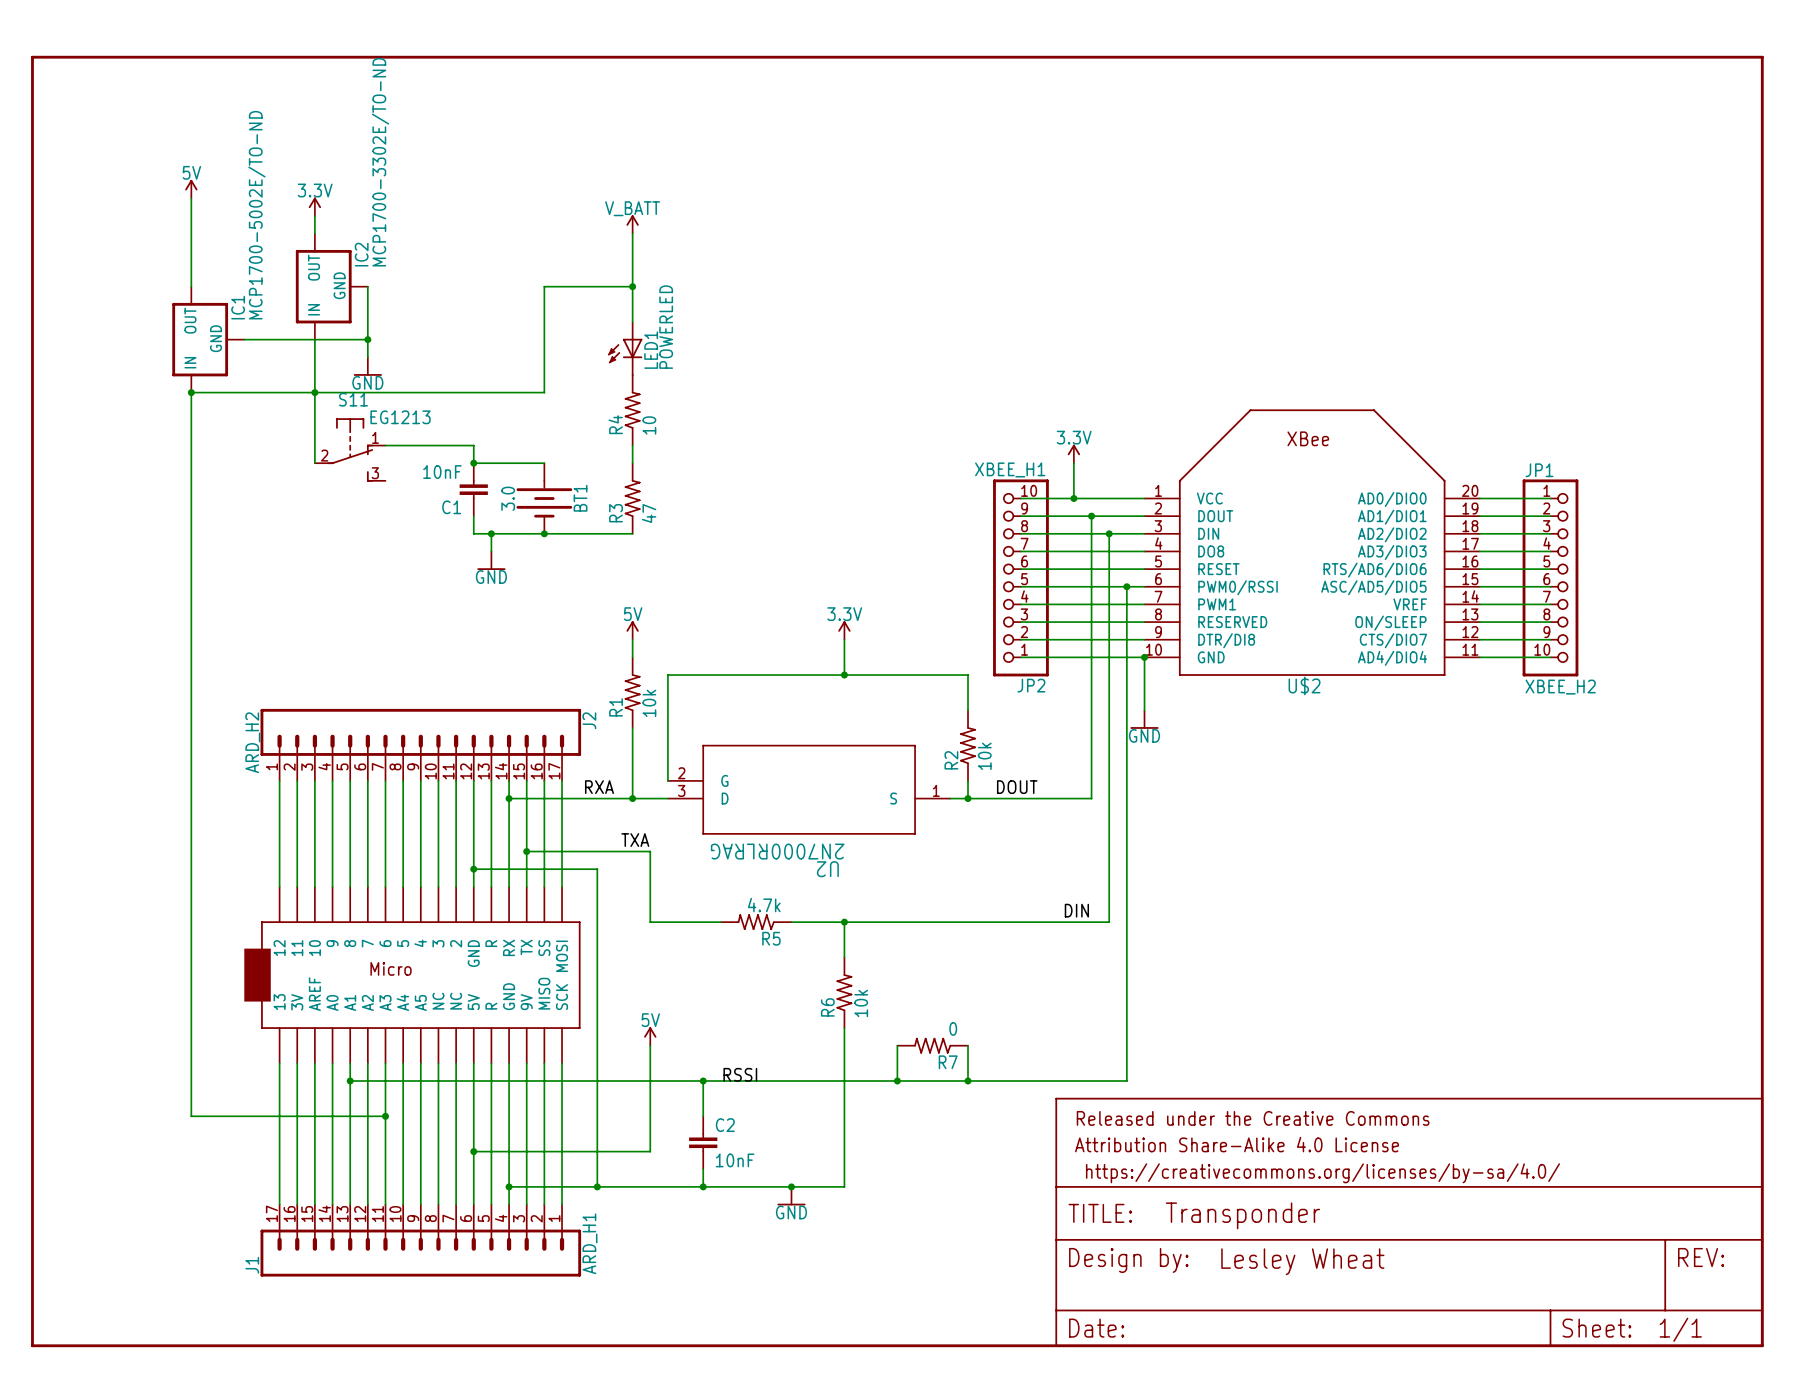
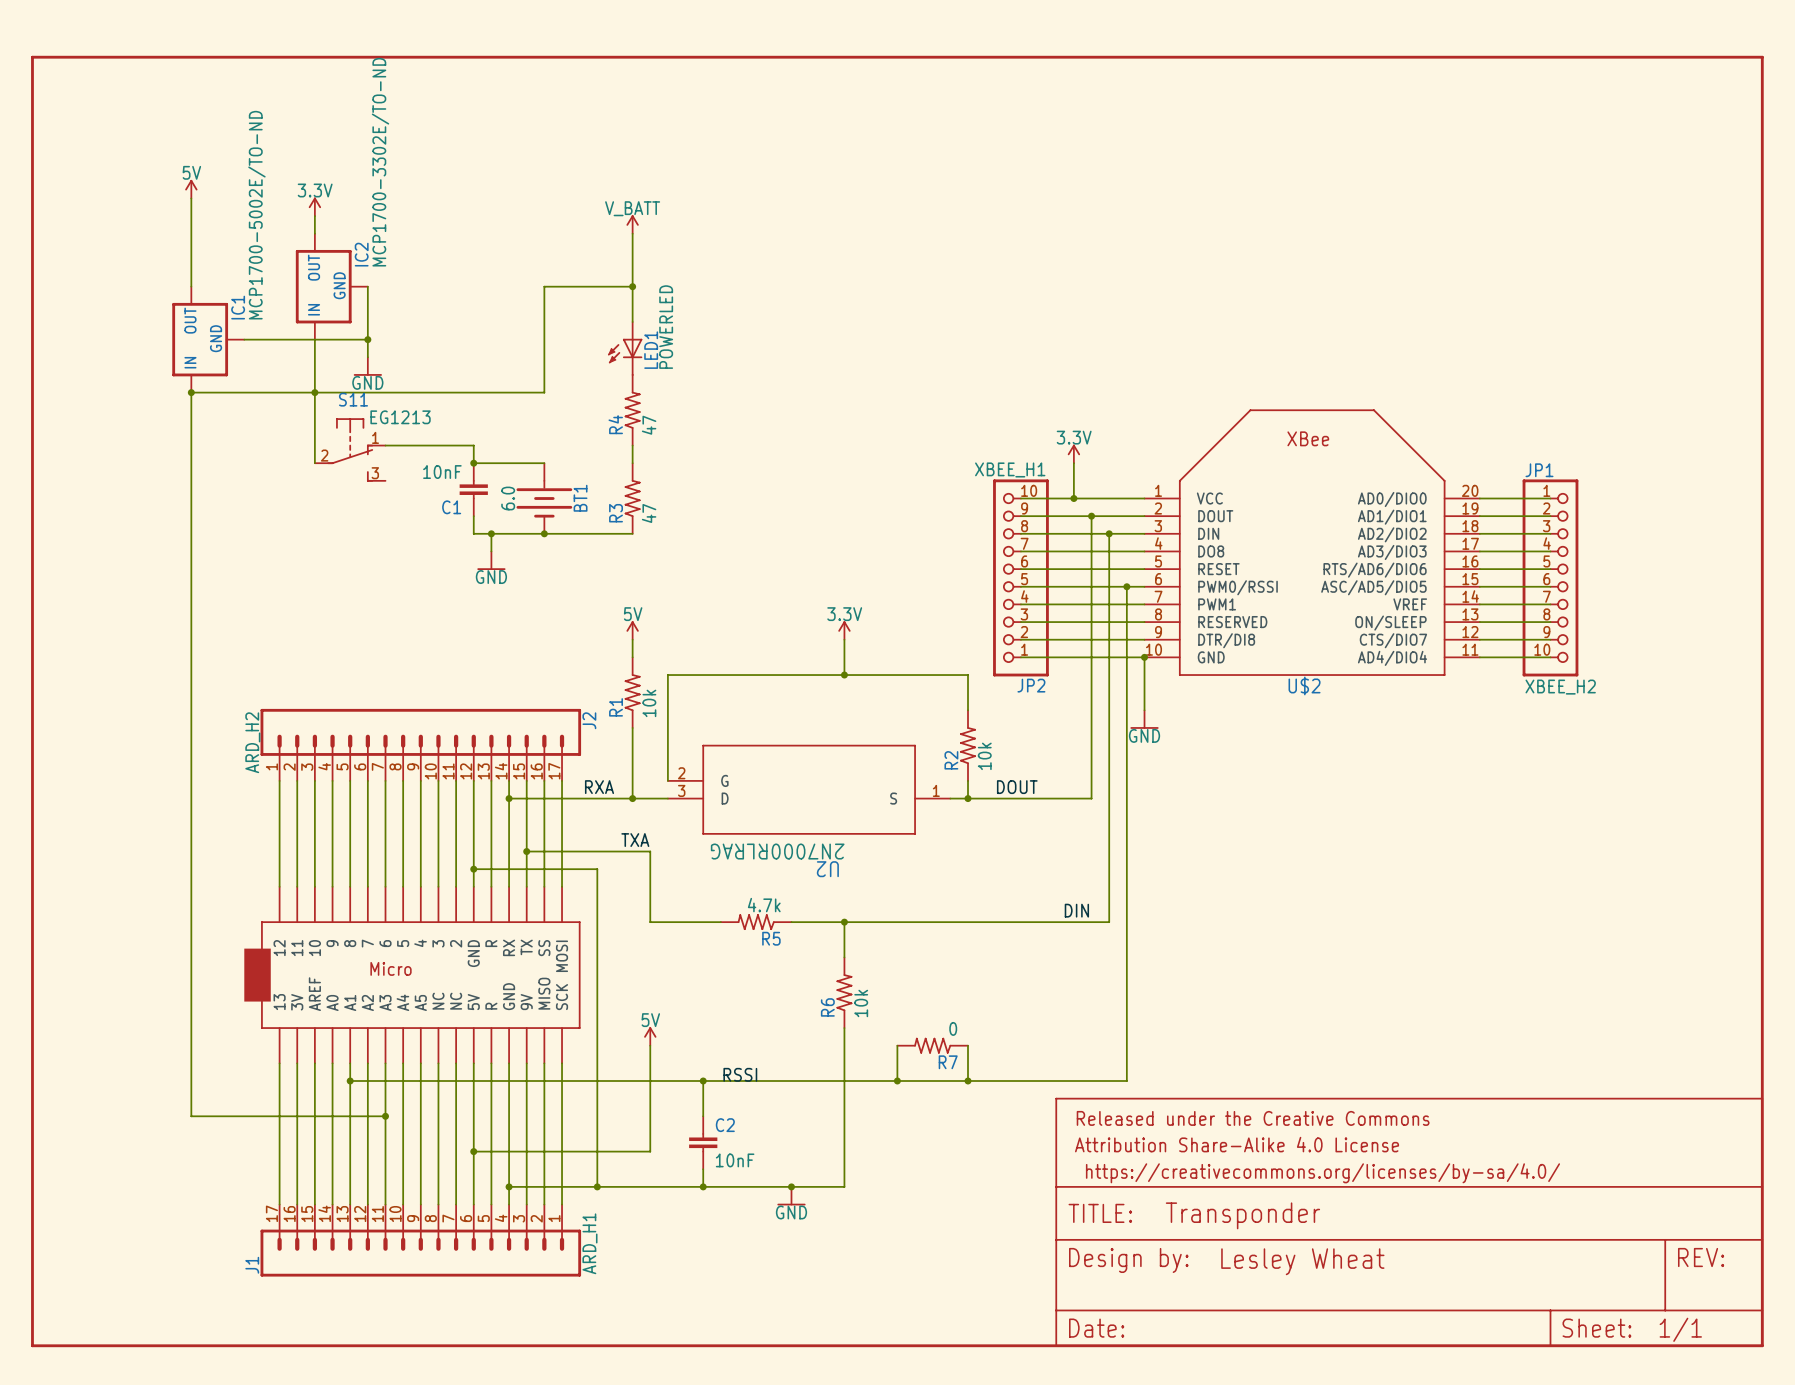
R4 value: 10 (649, 425) -> 47 (649, 425)
BT1 value: 3.0 (508, 498) -> 6.0 (508, 498)

